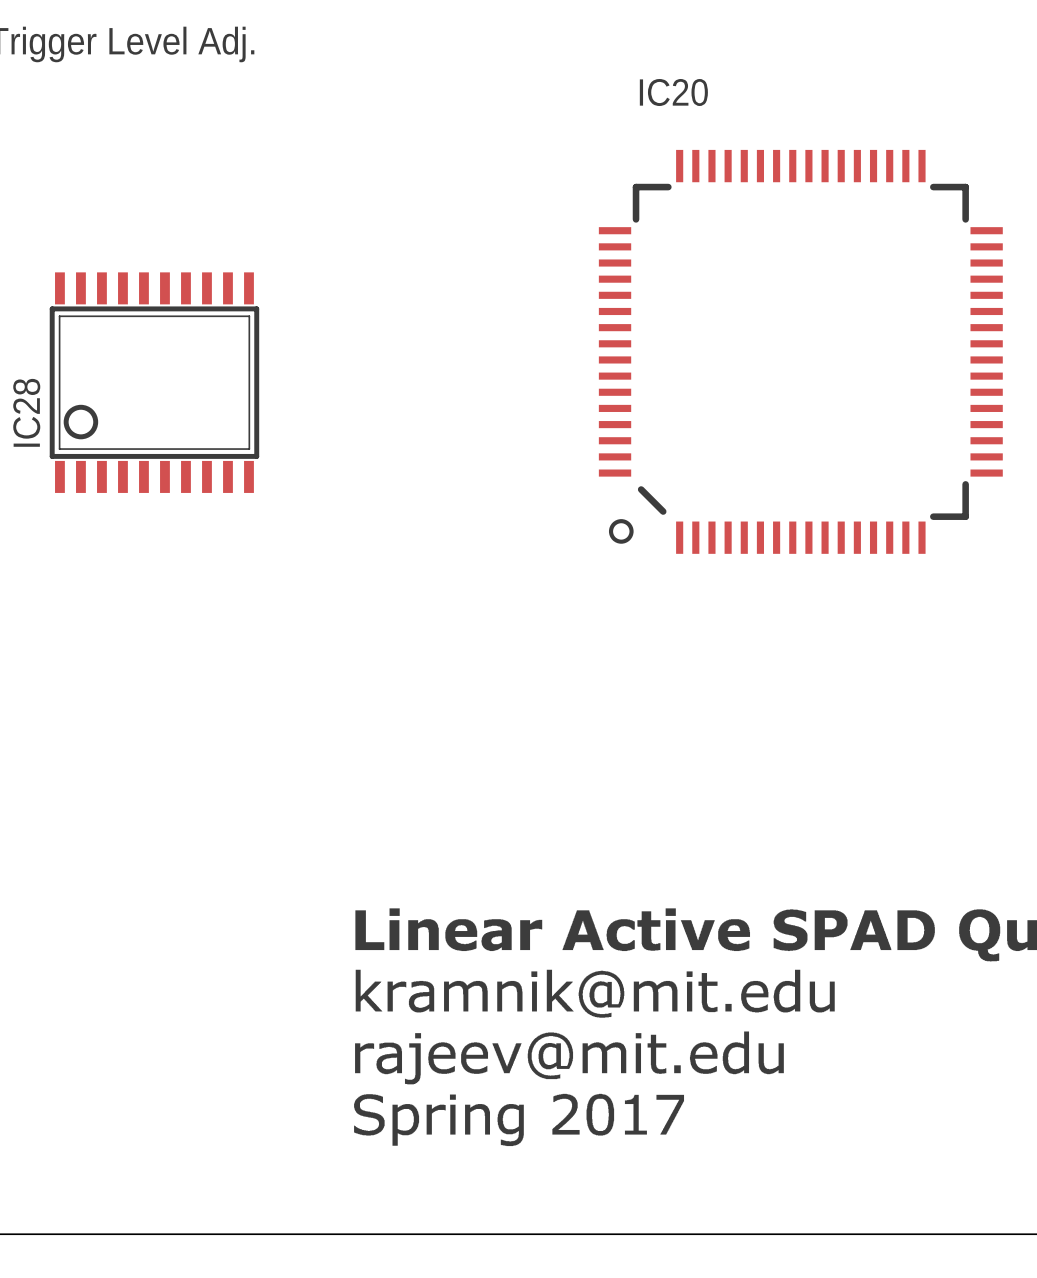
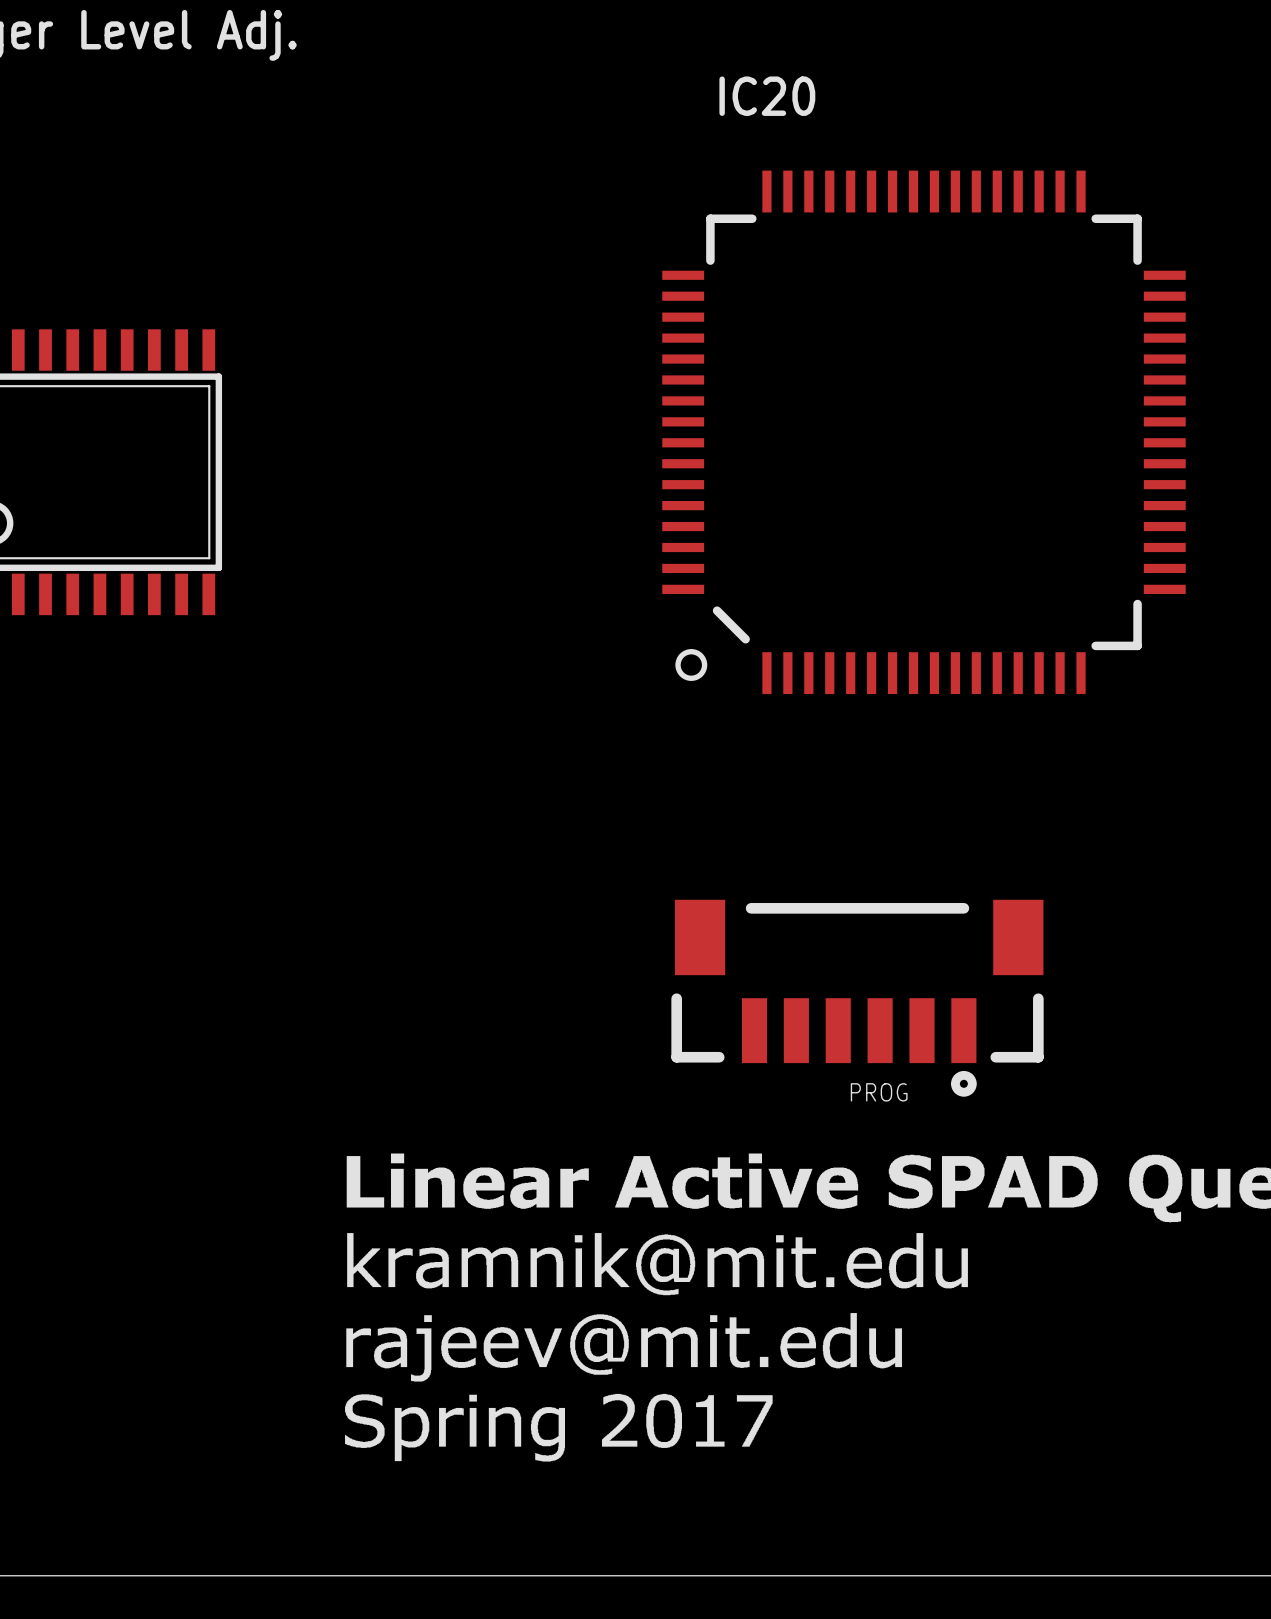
PROG: none -> (857, 998)

